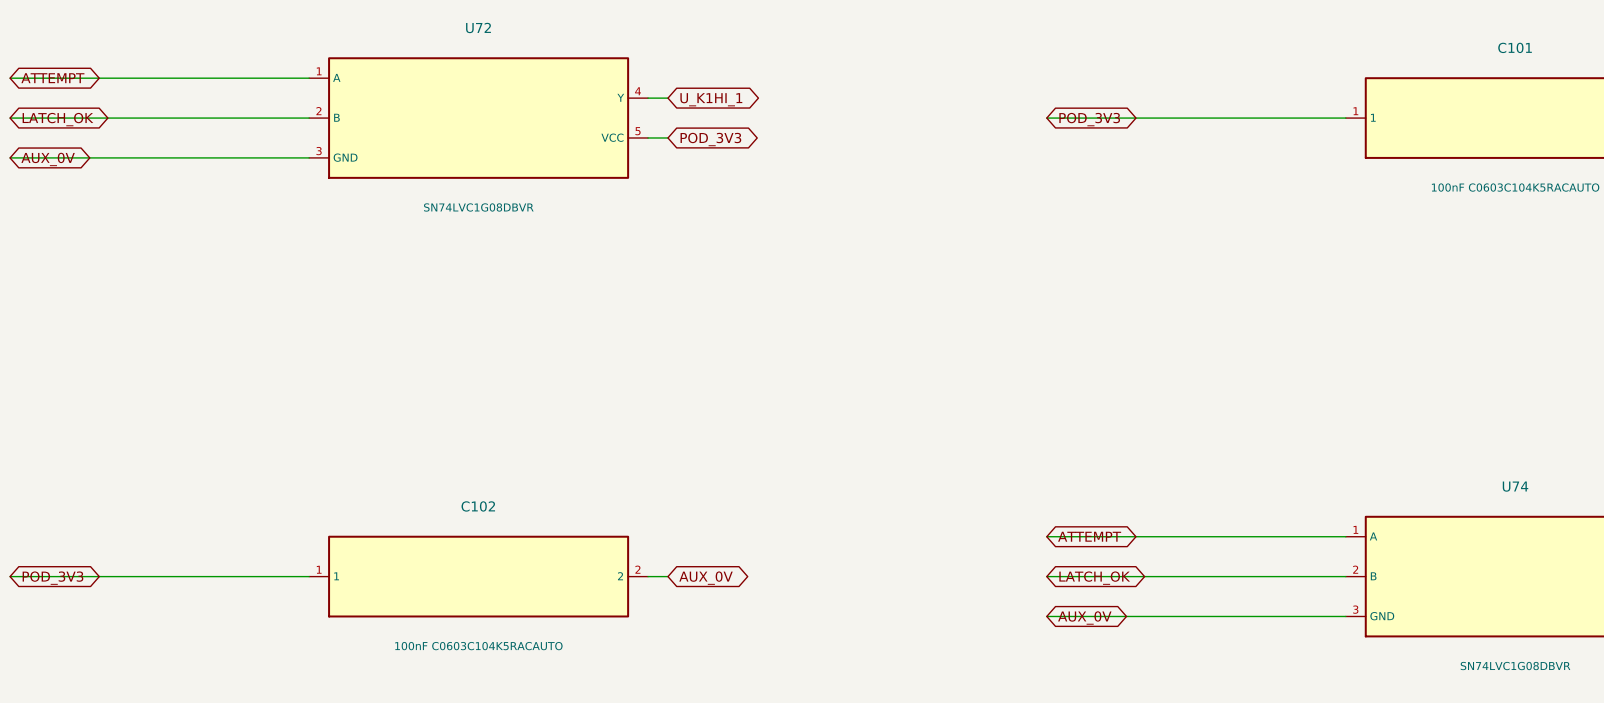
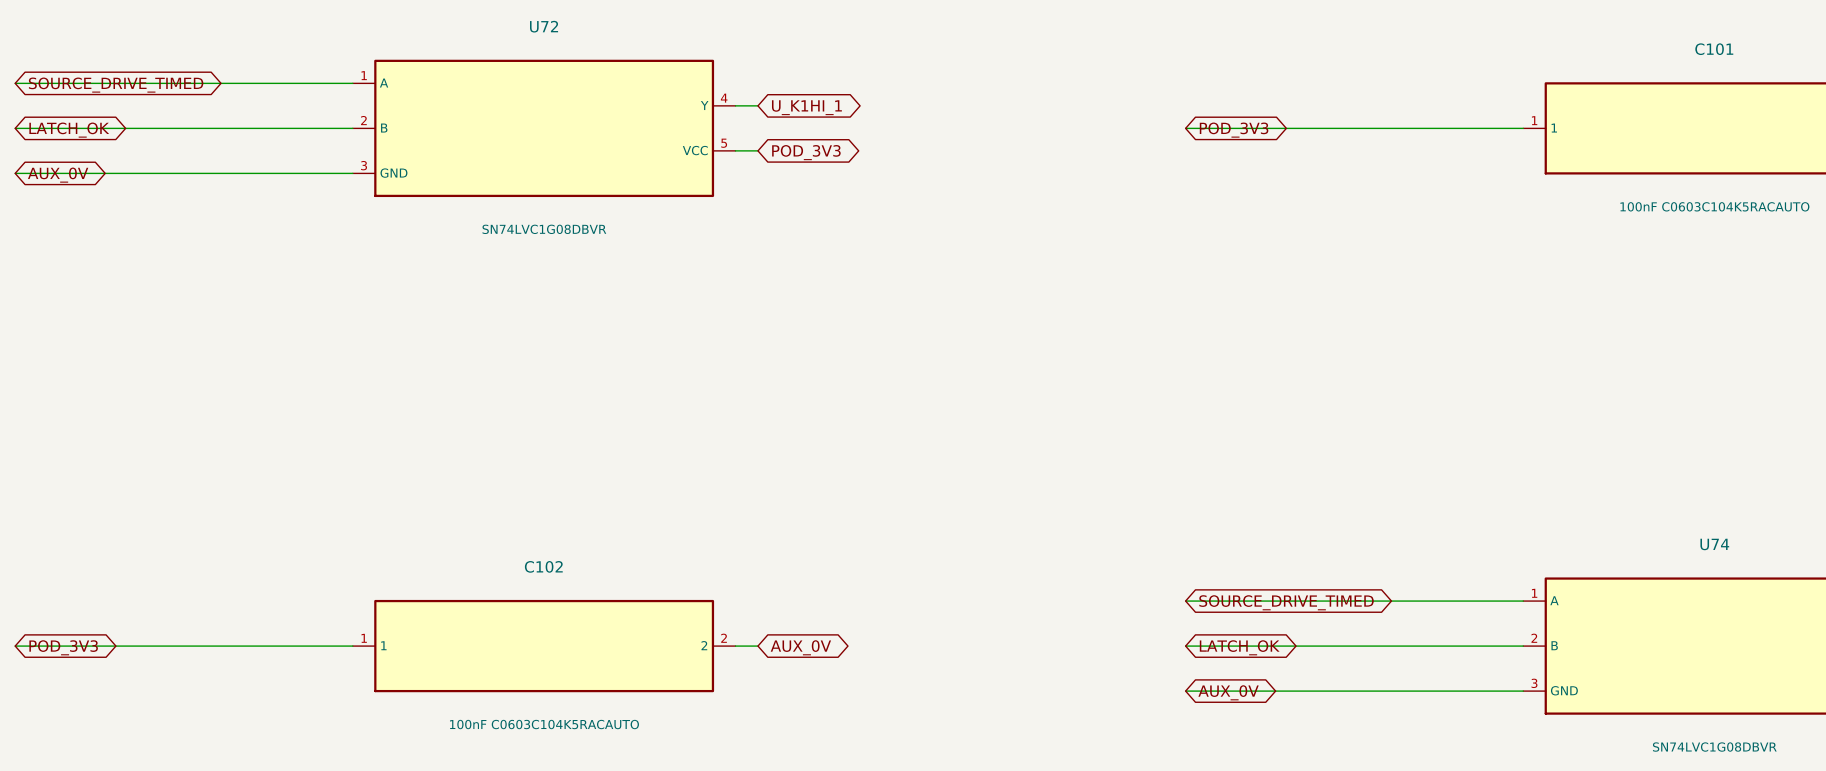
global label: ATTEMPT (52, 78) -> SOURCE_DRIVE_TIMED (116, 85)
global label: ATTEMPT (1089, 536) -> SOURCE_DRIVE_TIMED (1286, 602)

